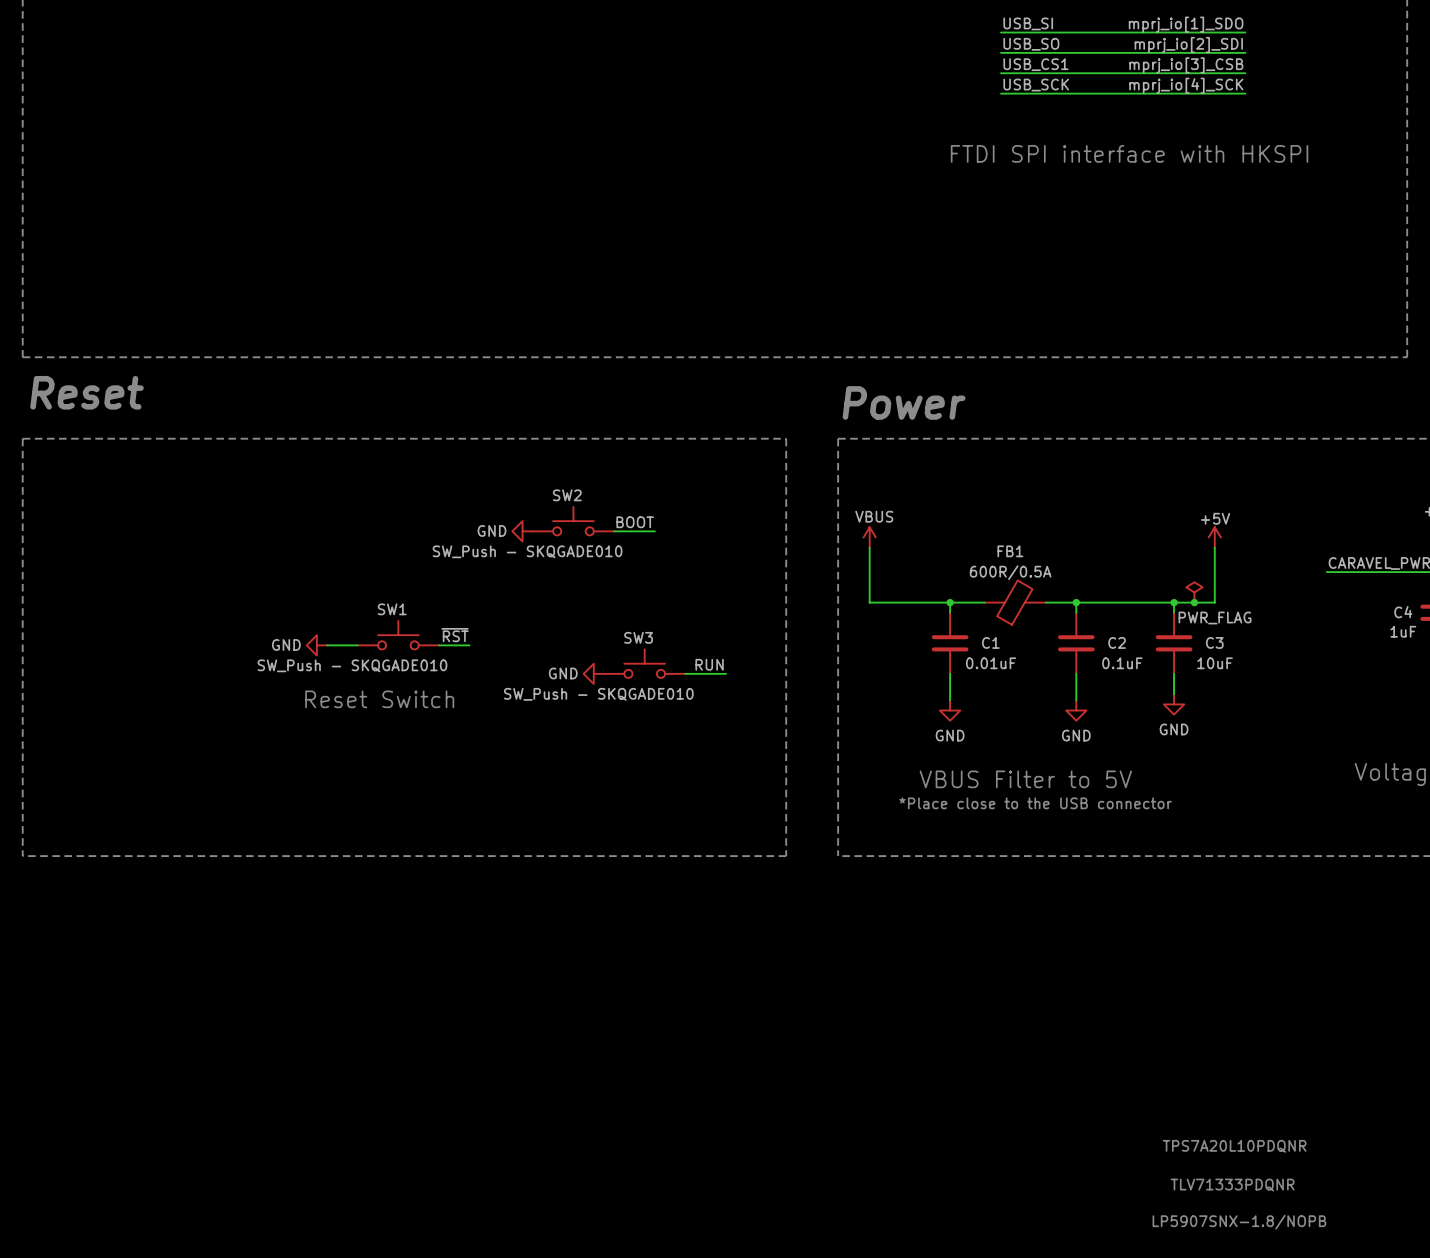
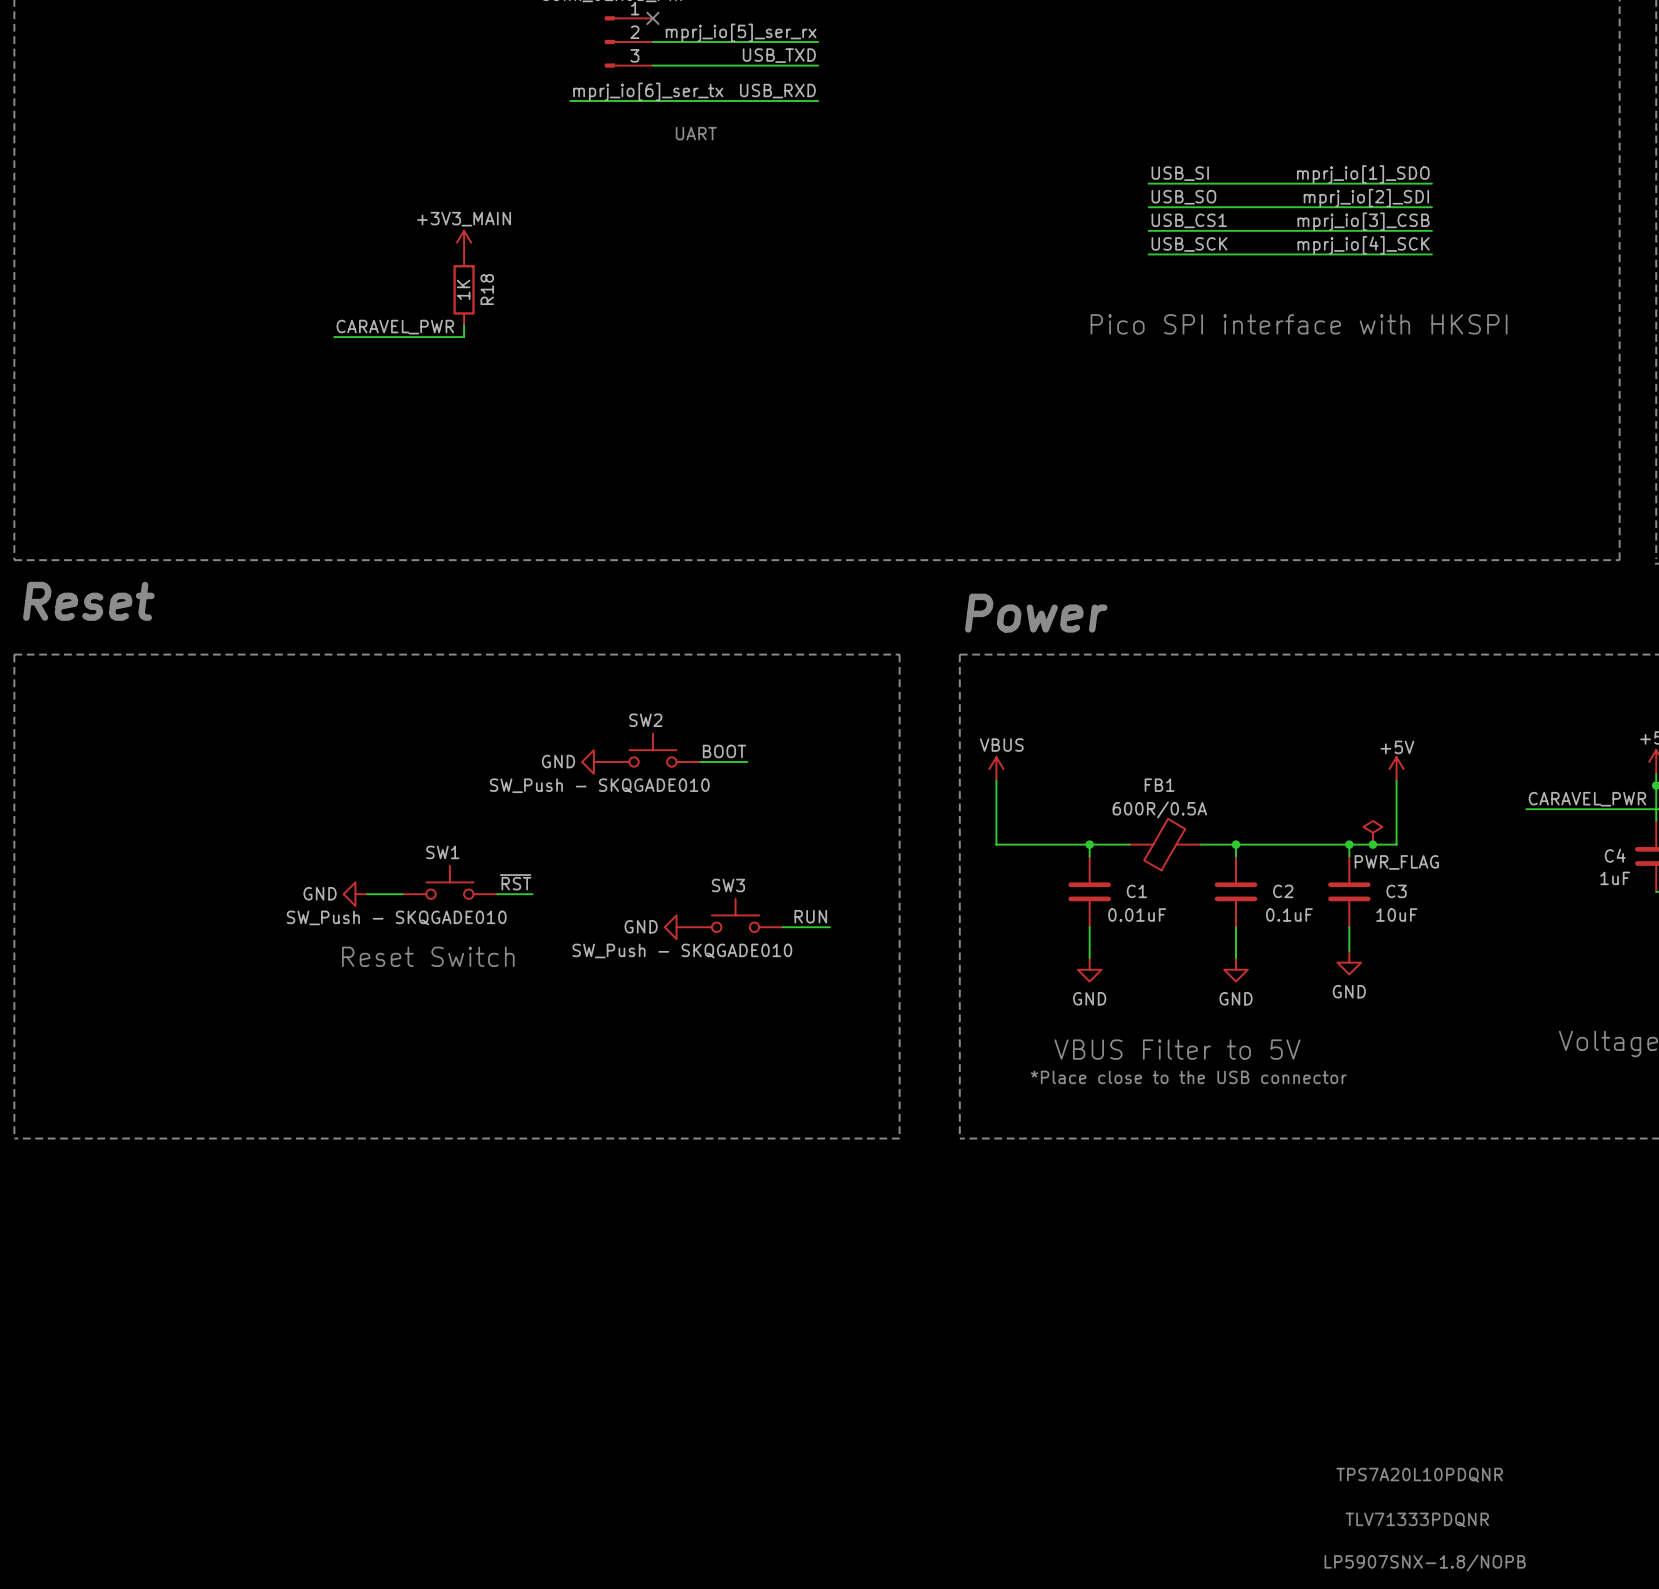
power symbol: none -> +3V3_MAIN (464, 242)
R18: none -> 1K (464, 289)
text: FTDI SPI interface with HKSPI (1129, 153) -> Pico SPI interface with HKSPI (1299, 324)
wire: none -> (464, 325) (464, 337) (334, 337)
label: none -> CARAVEL_PWR (395, 327)

